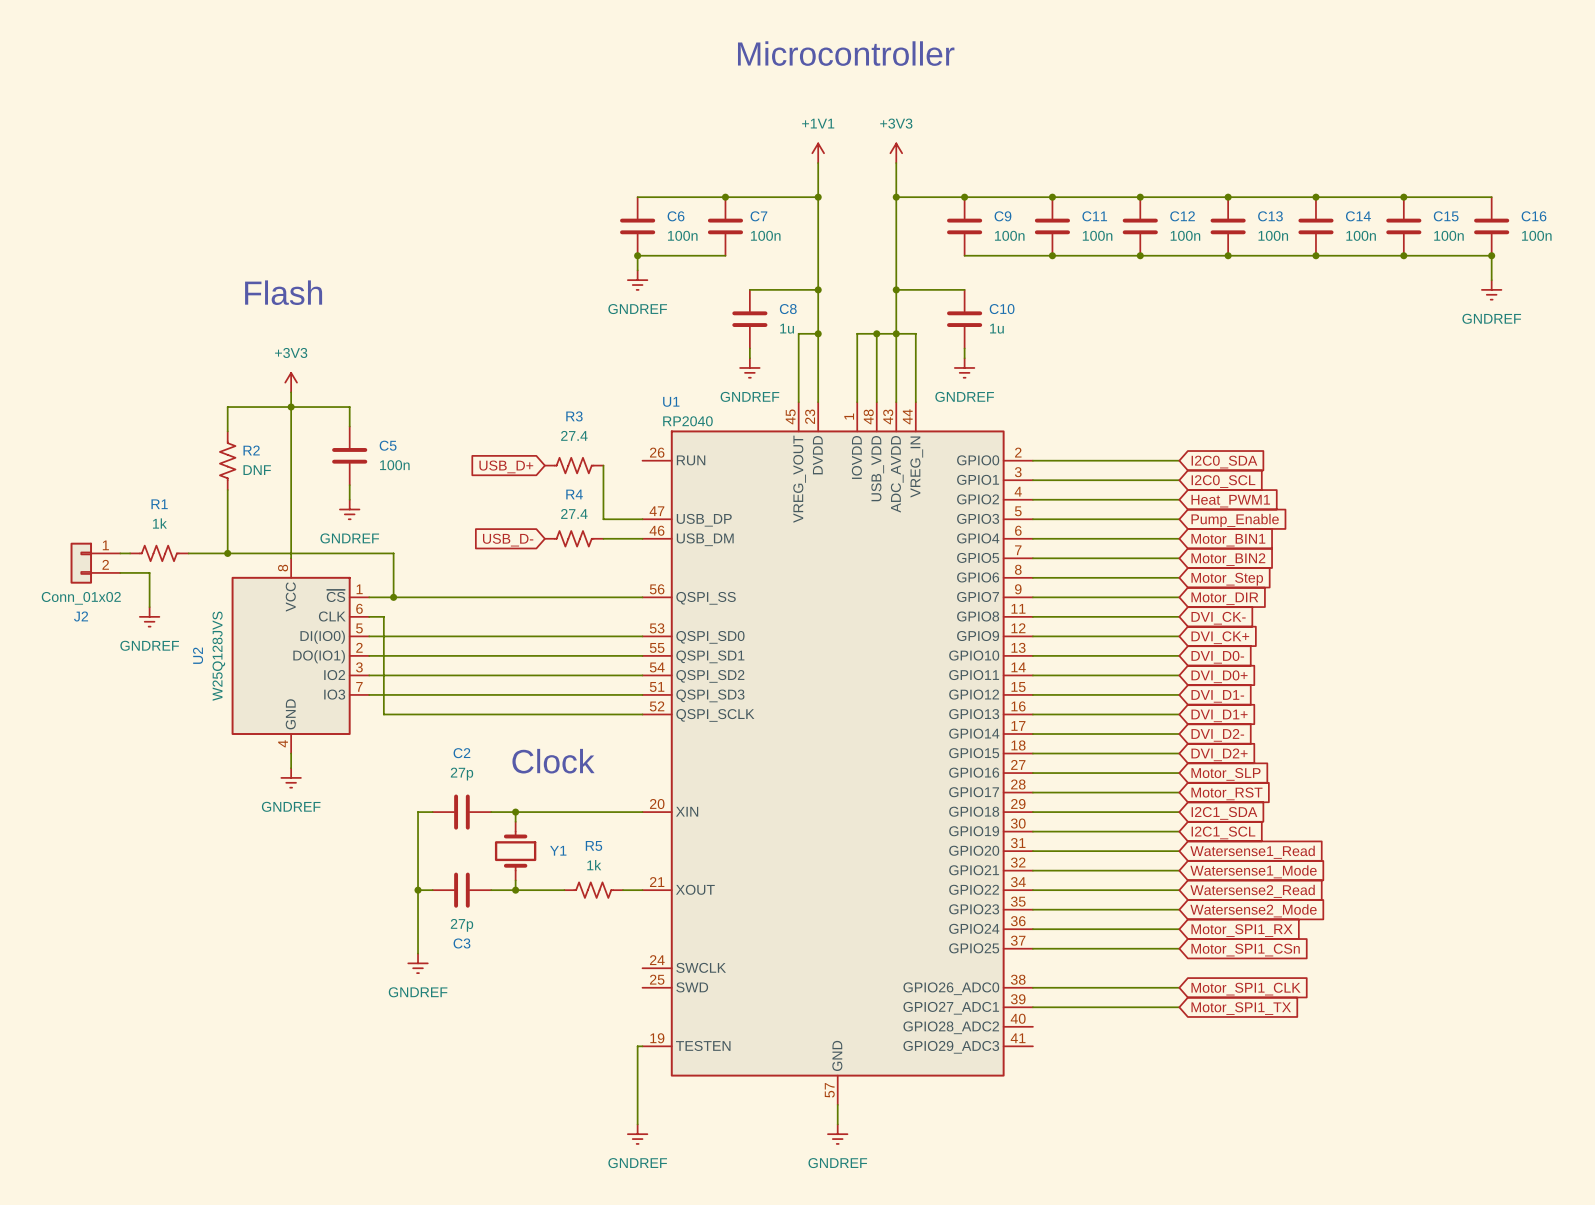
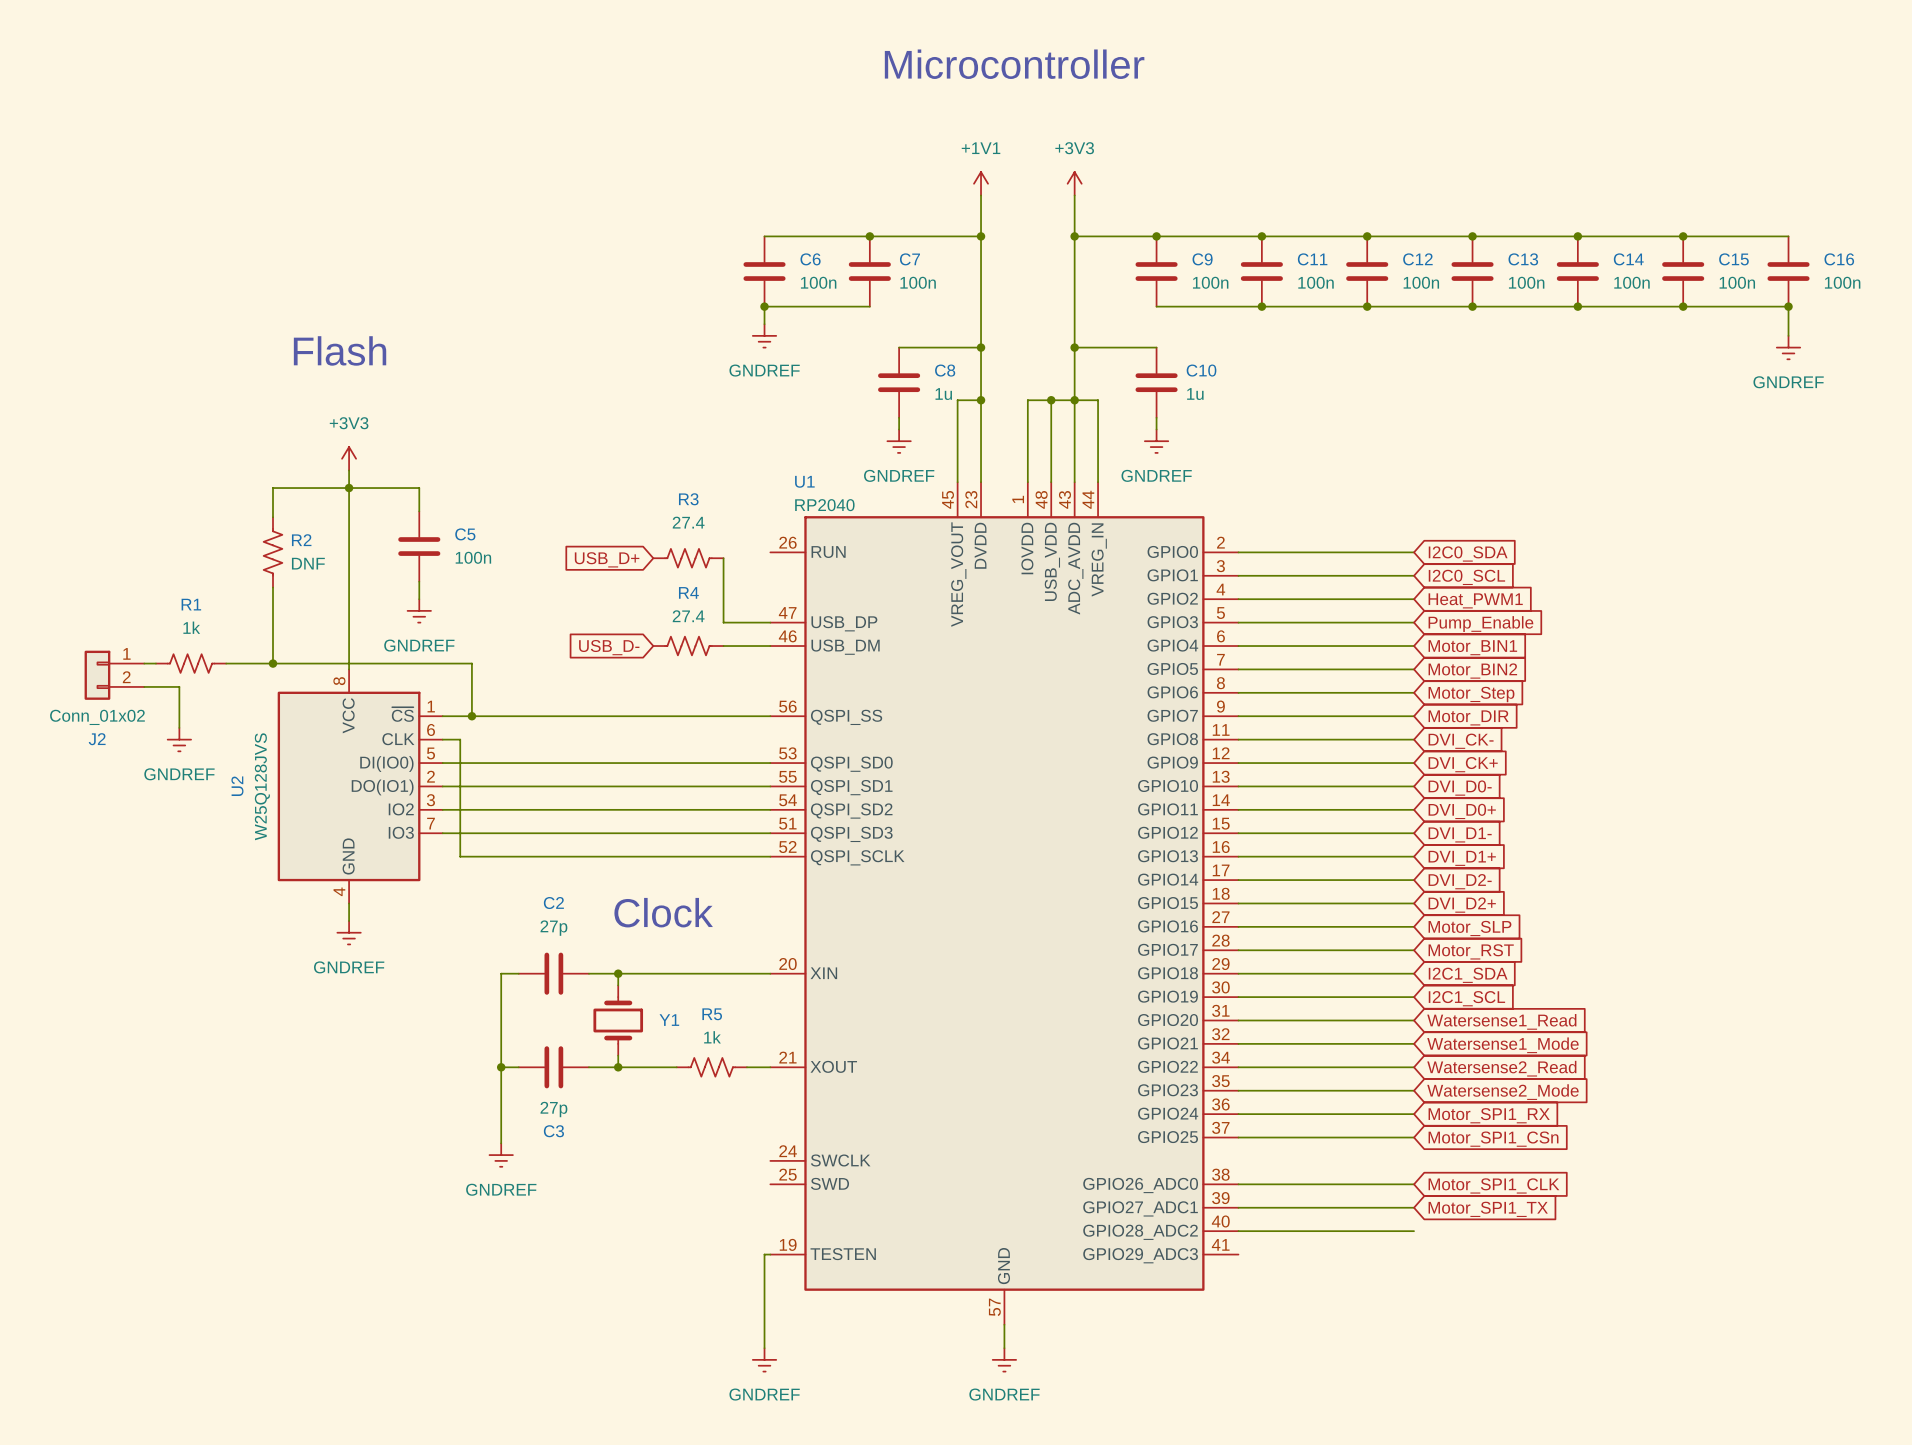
wire: none -> (1238, 1231) (1414, 1231)

